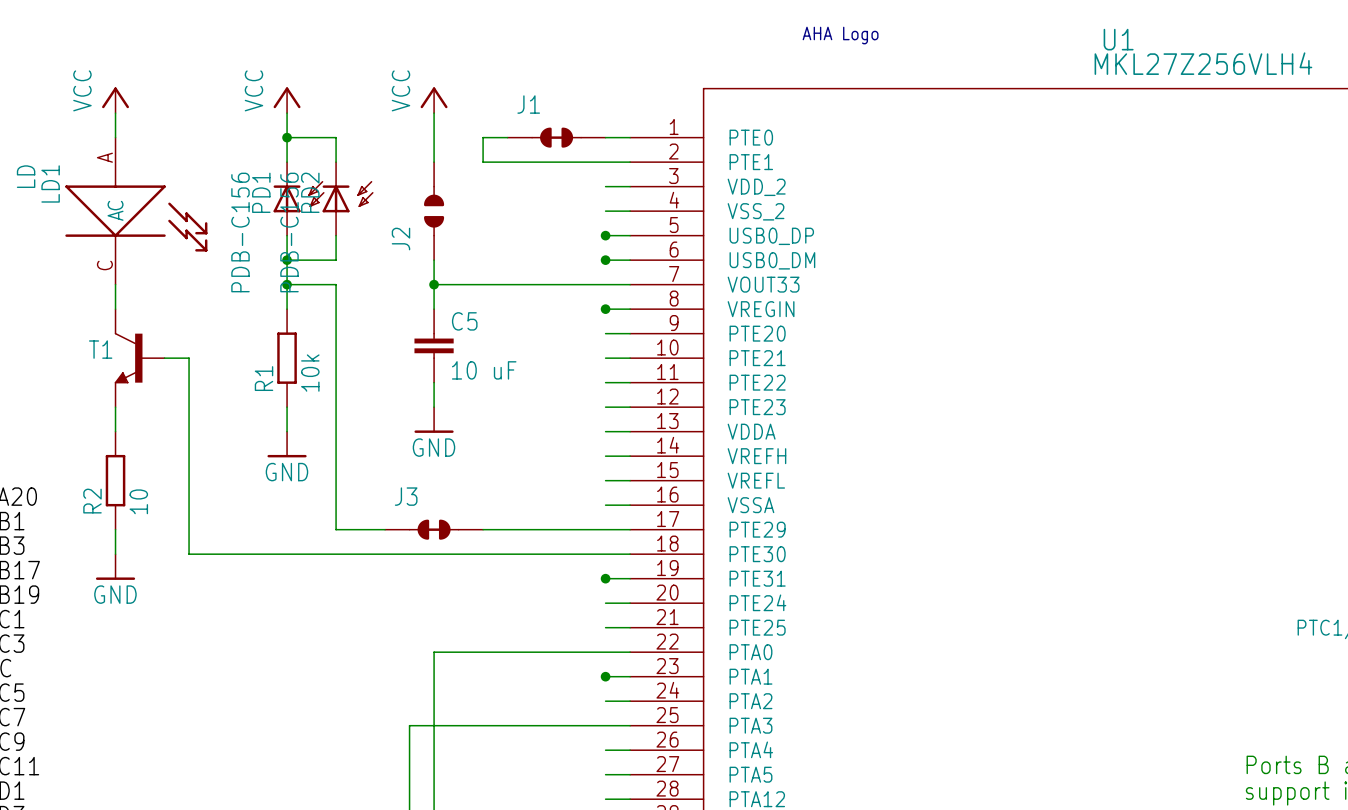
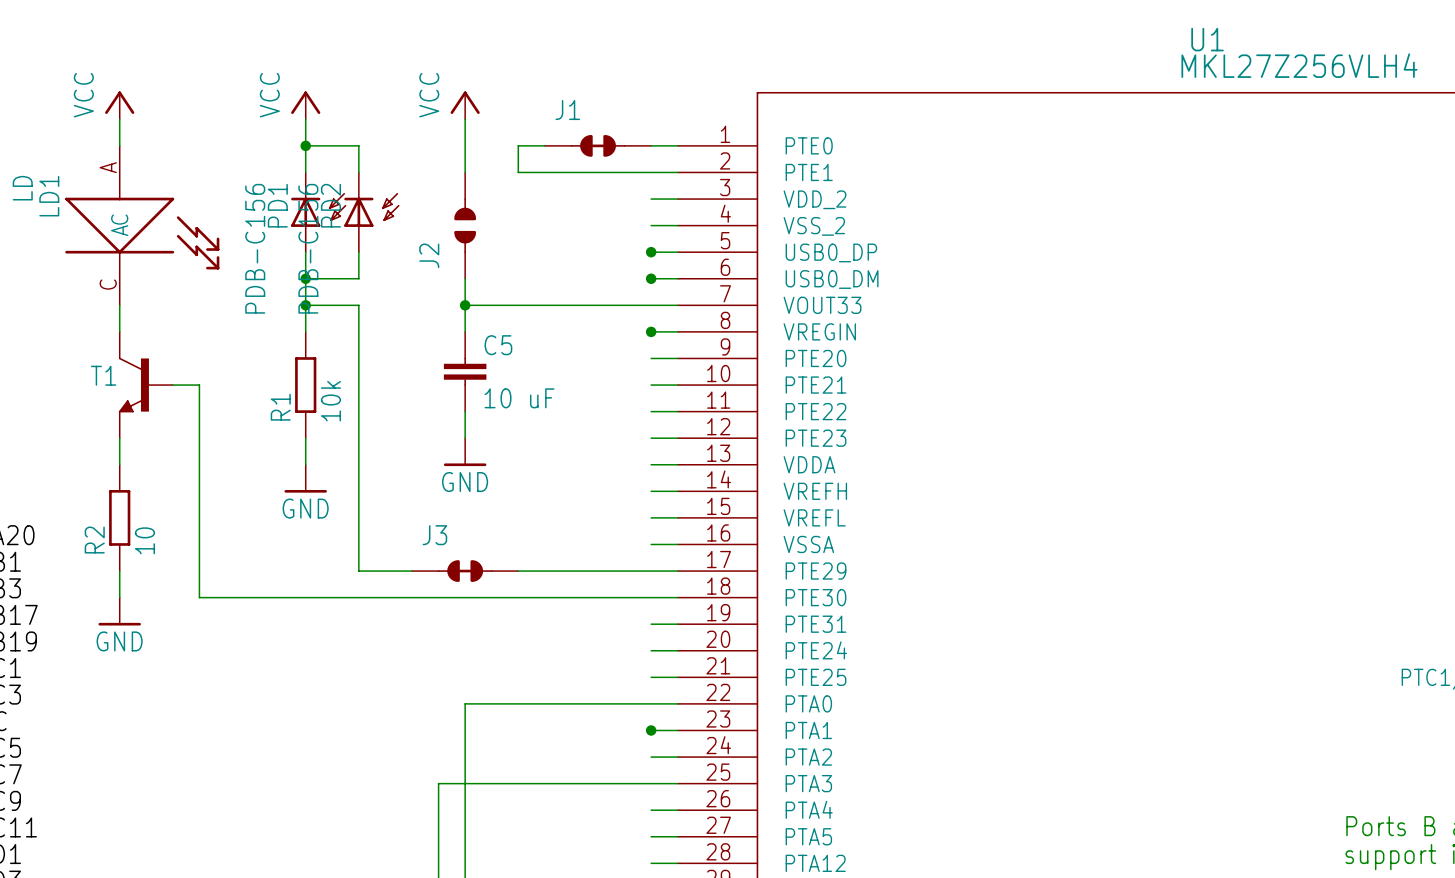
part: (840, 35) -> none
junction: (605, 578) -> none

